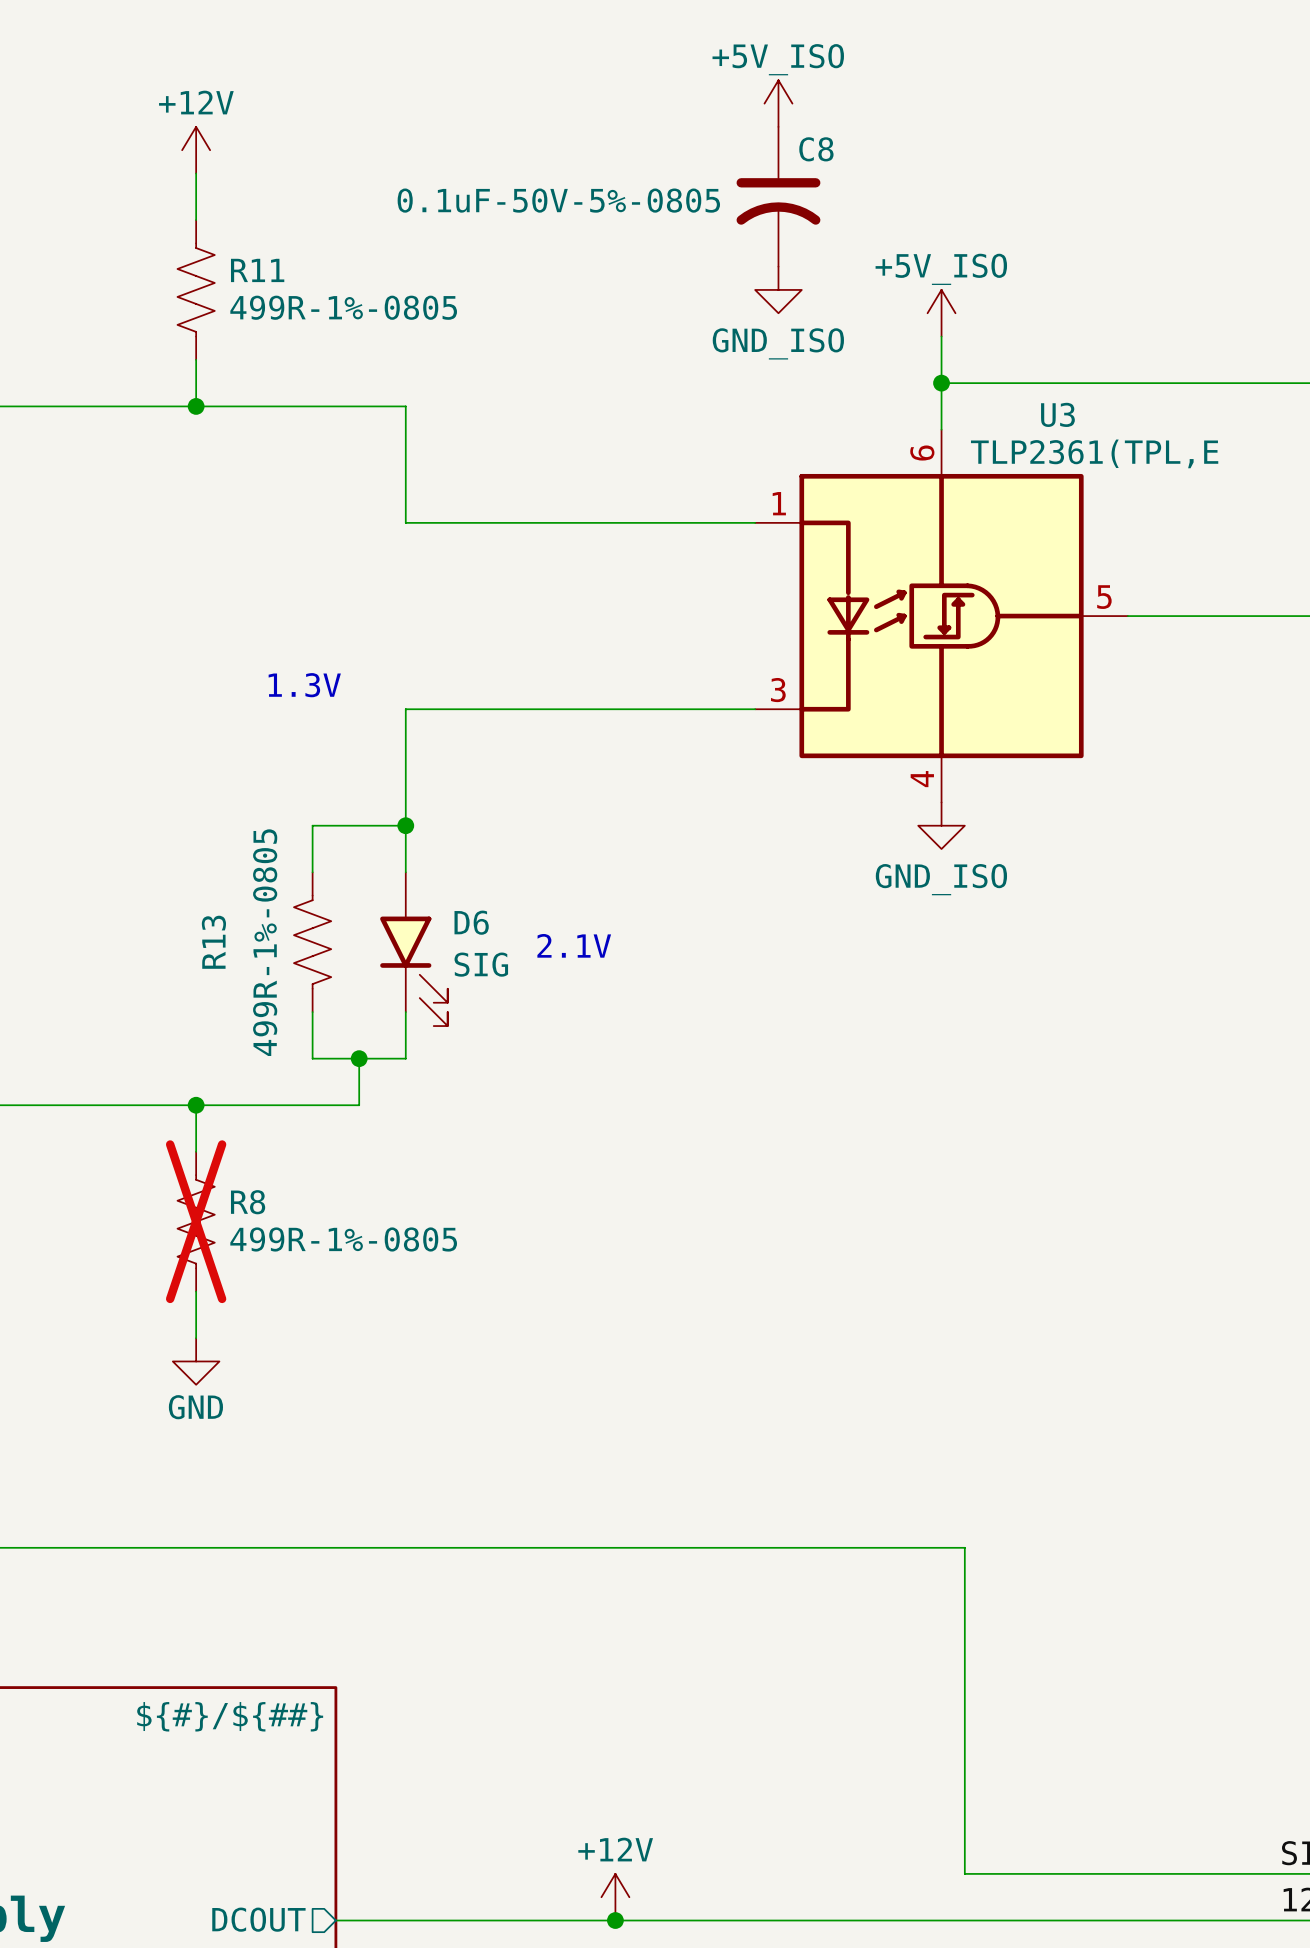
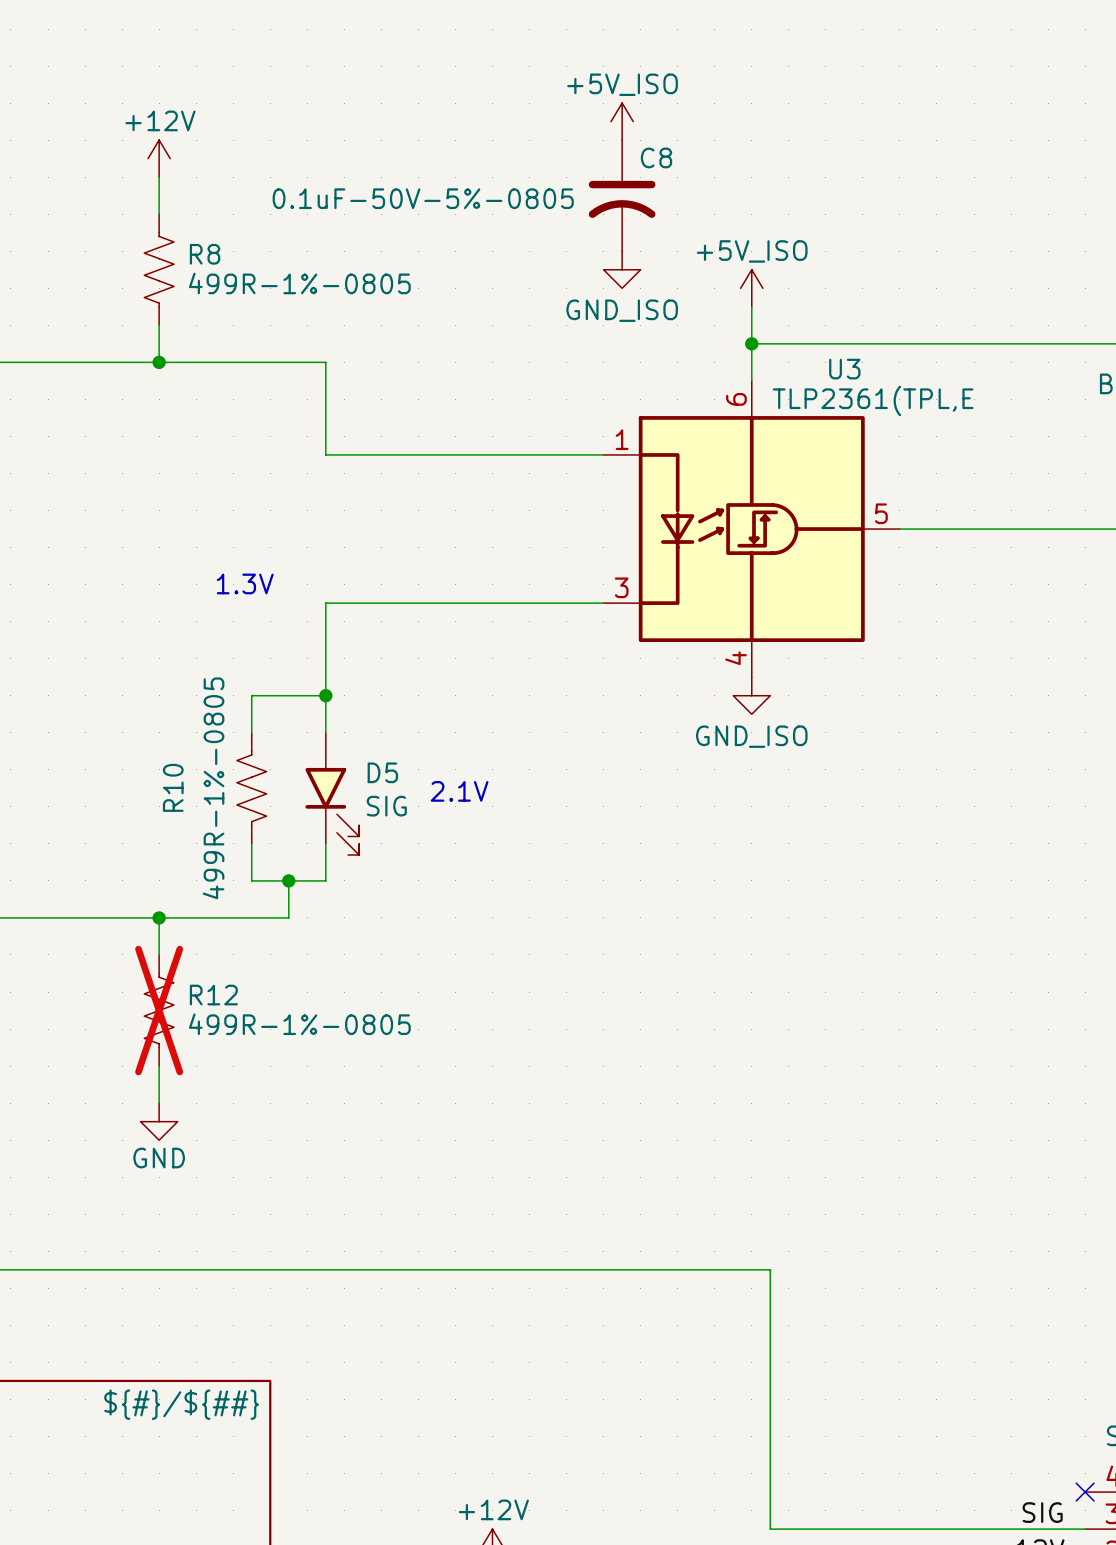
R11 name: R11 (257, 270) -> R8 (205, 254)
D6 name: D6 (471, 922) -> D5 (382, 772)
R13 name: R13 (213, 942) -> R10 (173, 787)
R8 name: R8 (248, 1202) -> R12 (213, 995)

